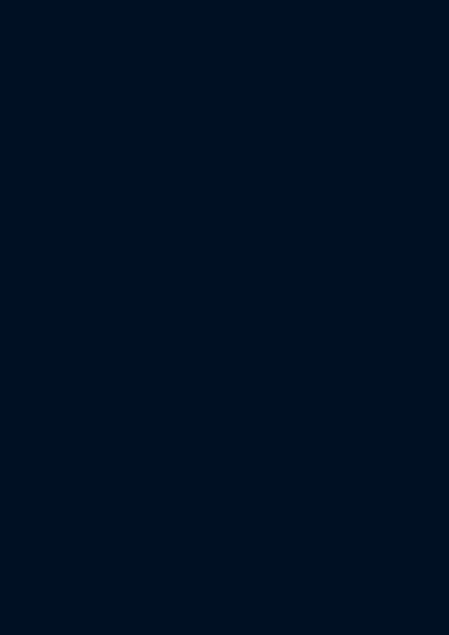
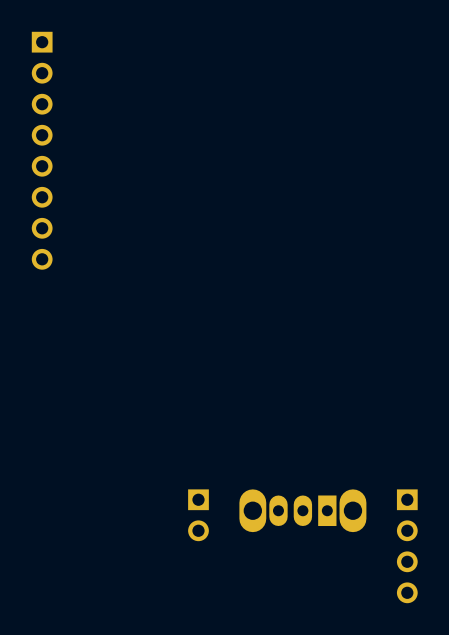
part: none -> (42, 150)
part: none -> (302, 510)
part: none -> (198, 515)
part: none -> (407, 546)

